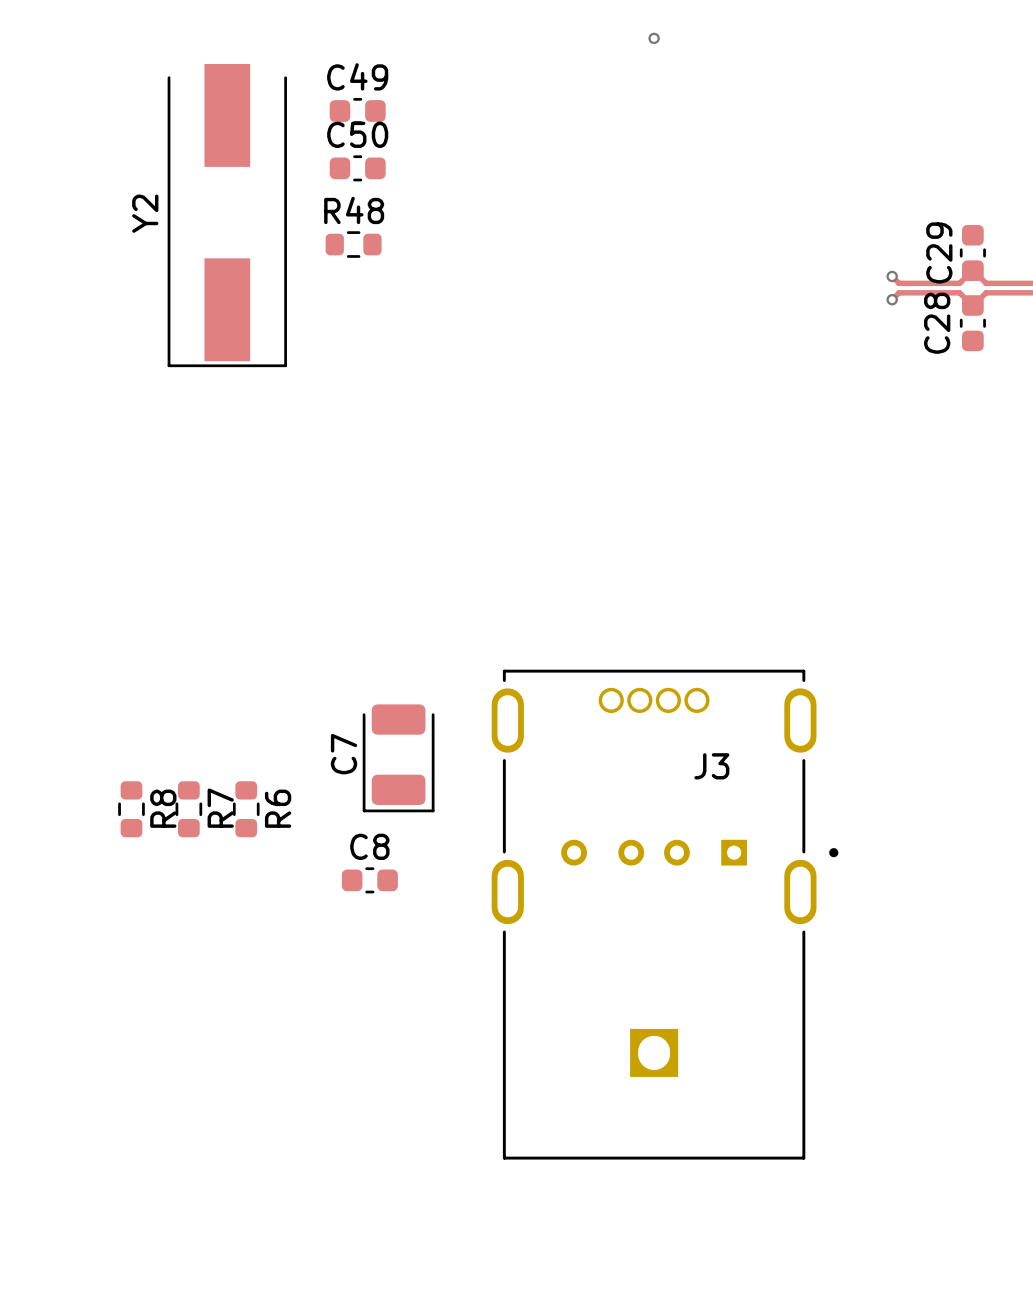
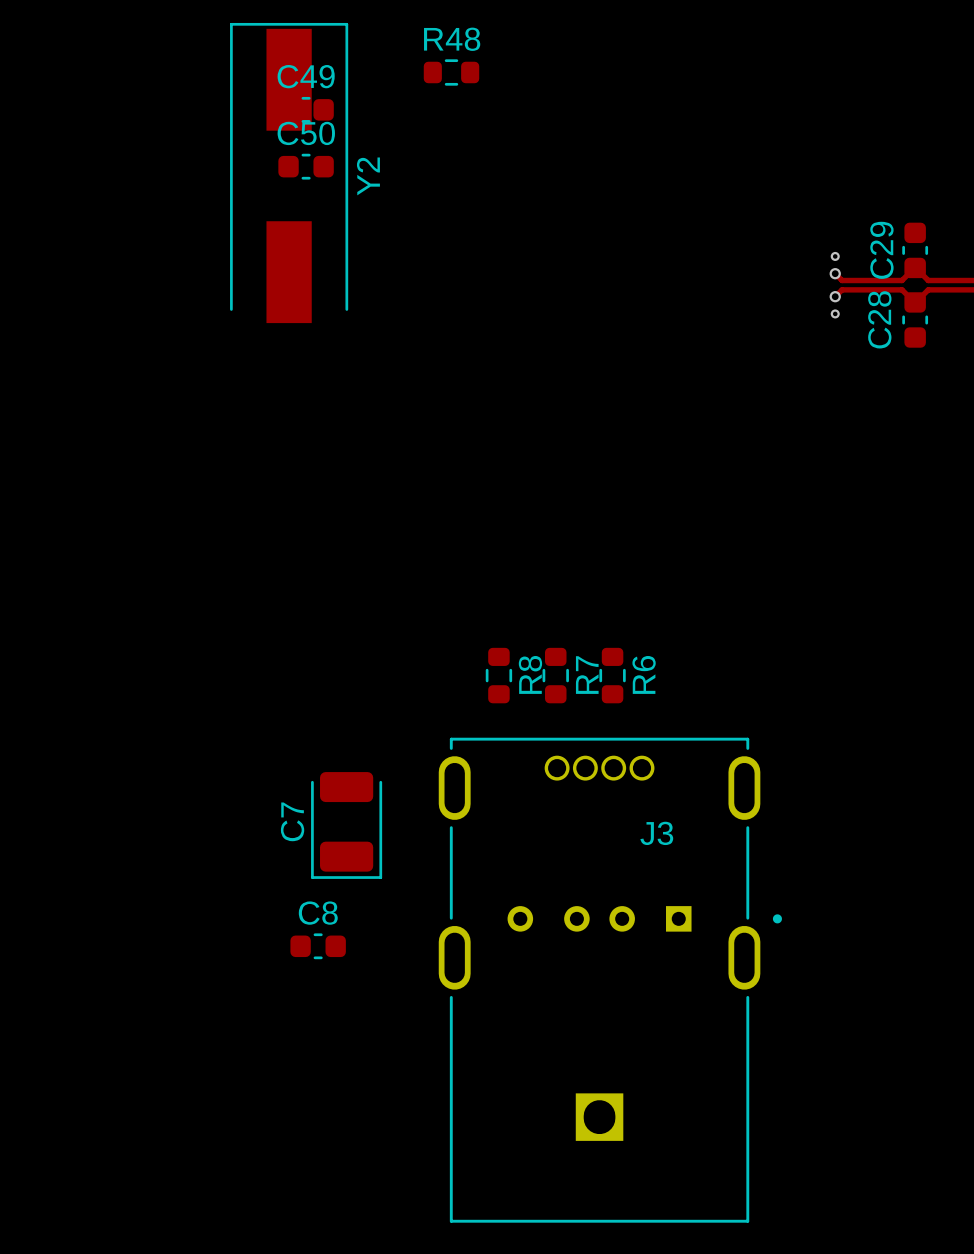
via: (654, 38) -> none
Y2 rotation: 0° (227, 215) -> 180° (289, 173)
R48 position: (353, 244) -> (451, 72)
via: none -> (835, 256)
via: none -> (835, 313)
C7 position: (398, 758) -> (346, 825)
R8 position: (131, 809) -> (498, 675)
R7 position: (188, 809) -> (555, 675)
R6 position: (246, 809) -> (612, 675)
C8 position: (369, 880) -> (318, 946)
J3 position: (665, 914) -> (610, 980)

